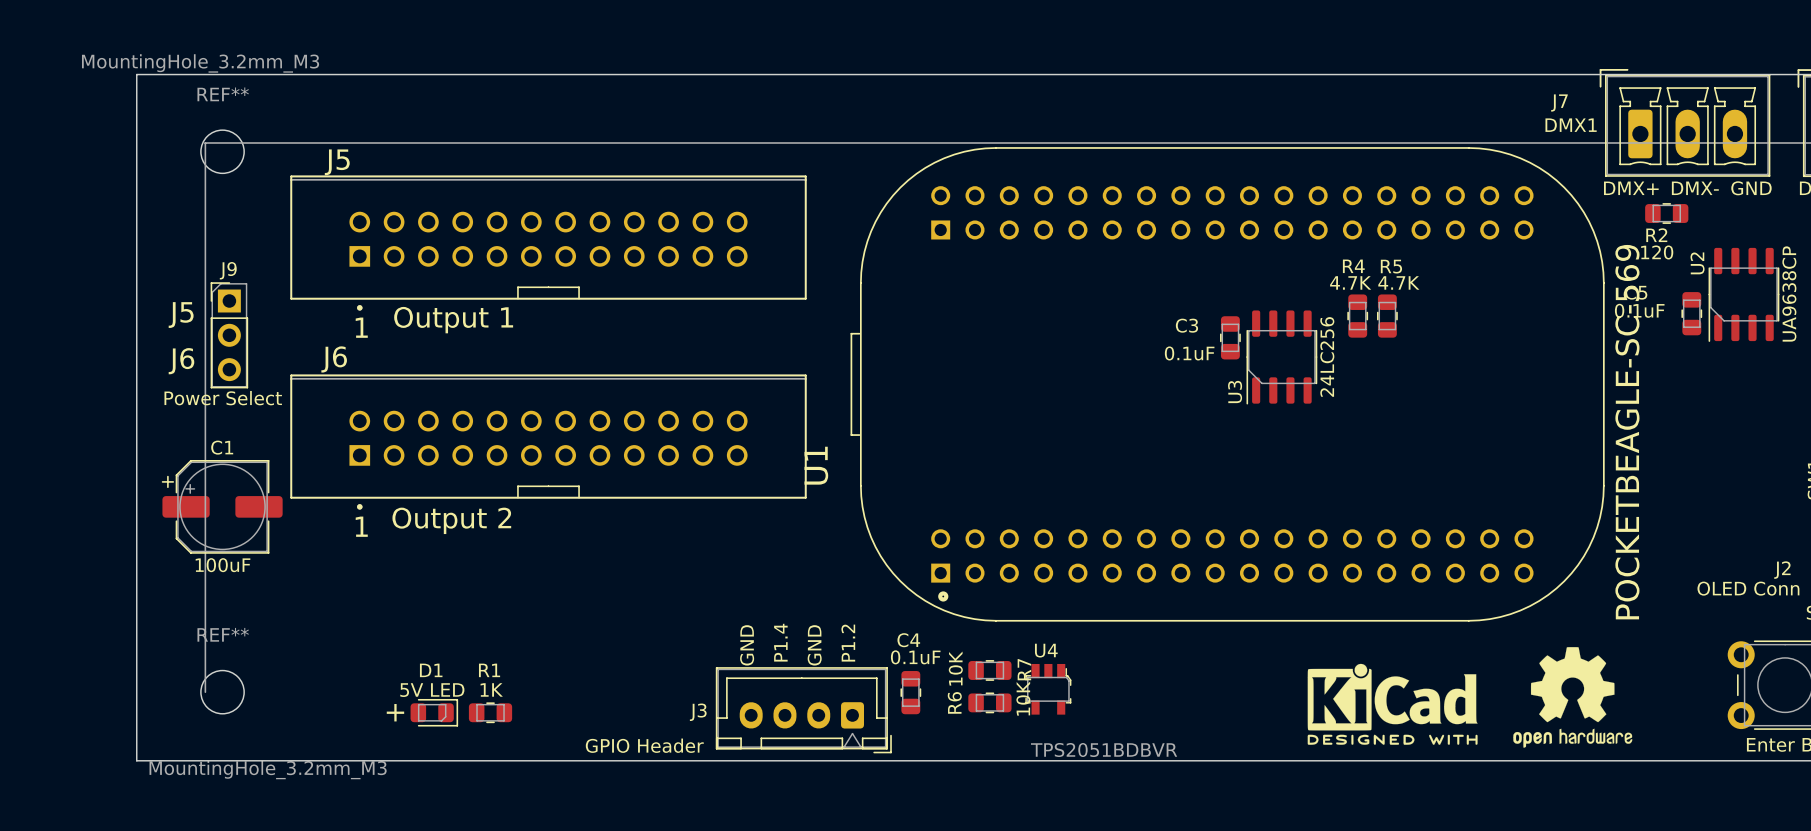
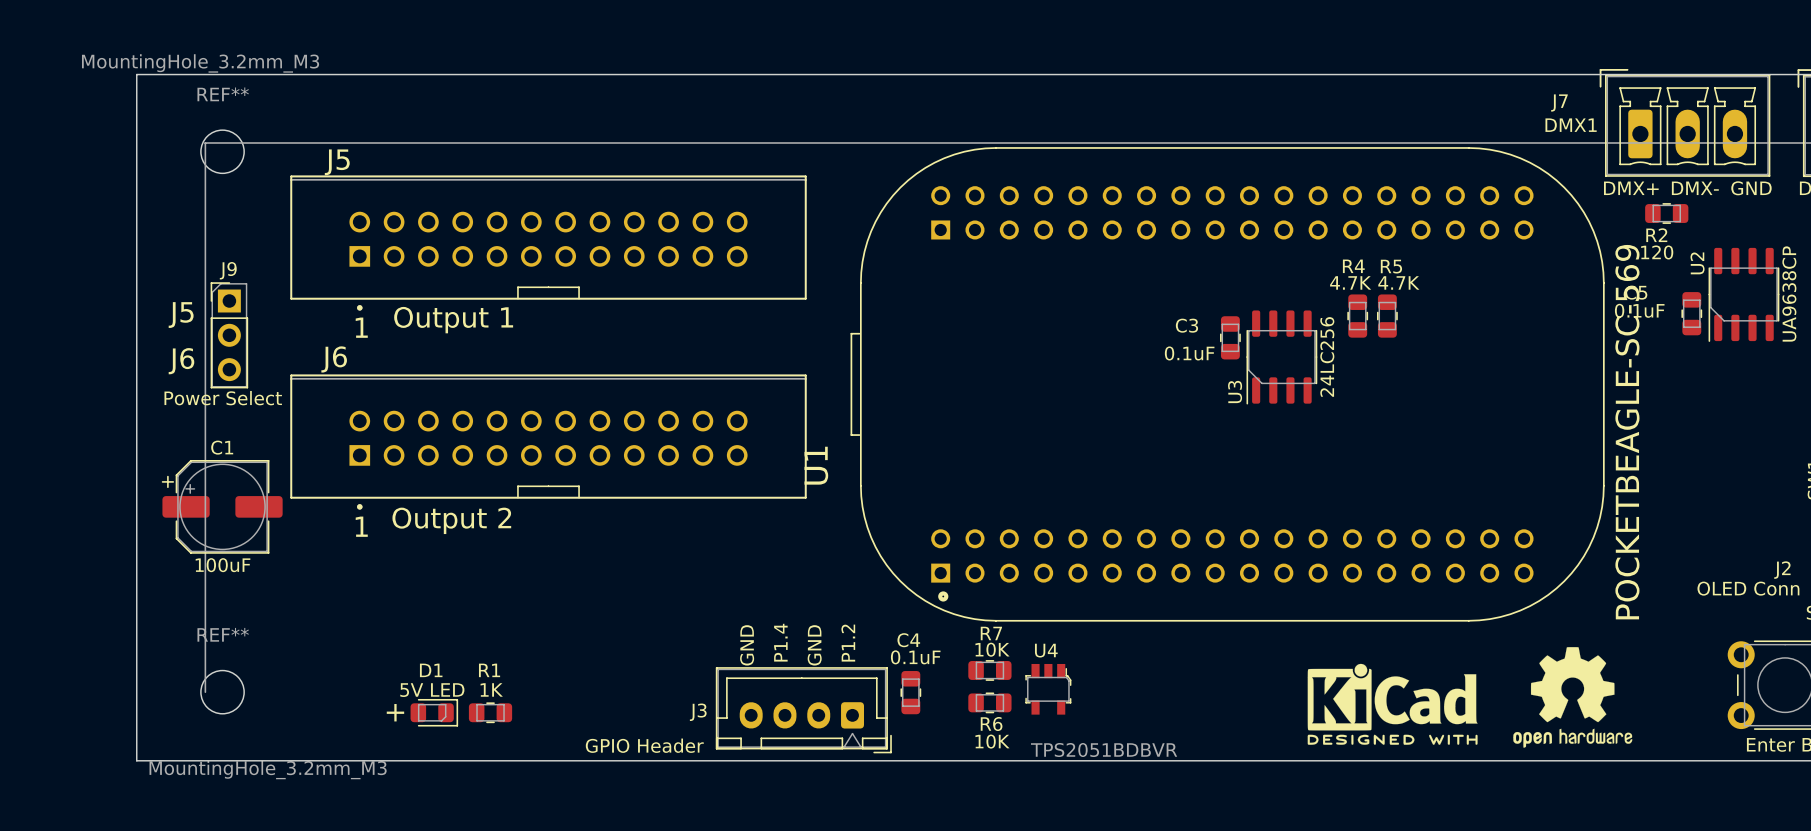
R7 value rotation: 0° (955, 668) -> 90° clockwise (992, 649)
R7 name rotation: 0° (1024, 669) -> 90° clockwise (991, 633)
R7 name position: R7 (1024, 669) -> R7 (991, 633)
R6 value rotation: 0° (1023, 698) -> 90° clockwise (992, 741)
R6 value position: 10K (1023, 698) -> 10K (992, 741)
R6 name rotation: 0° (954, 702) -> 90° clockwise (991, 724)
R6 name position: R6 (954, 702) -> R6 (991, 724)

